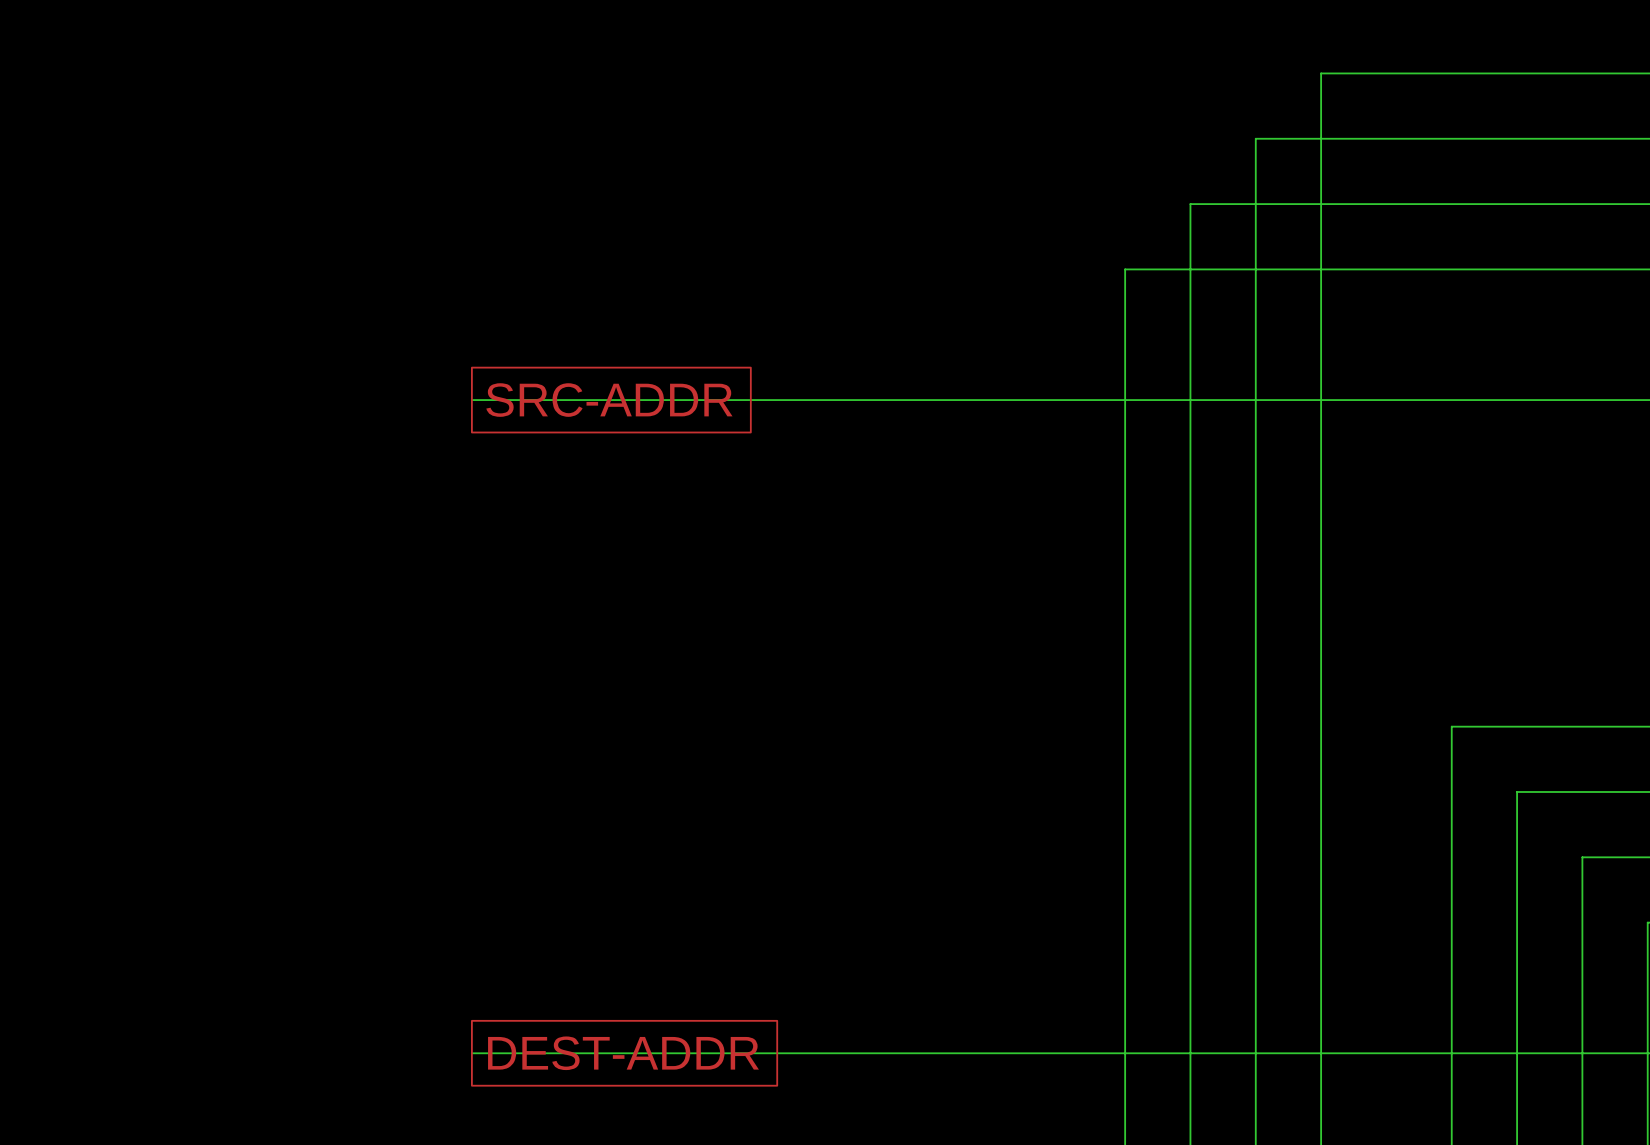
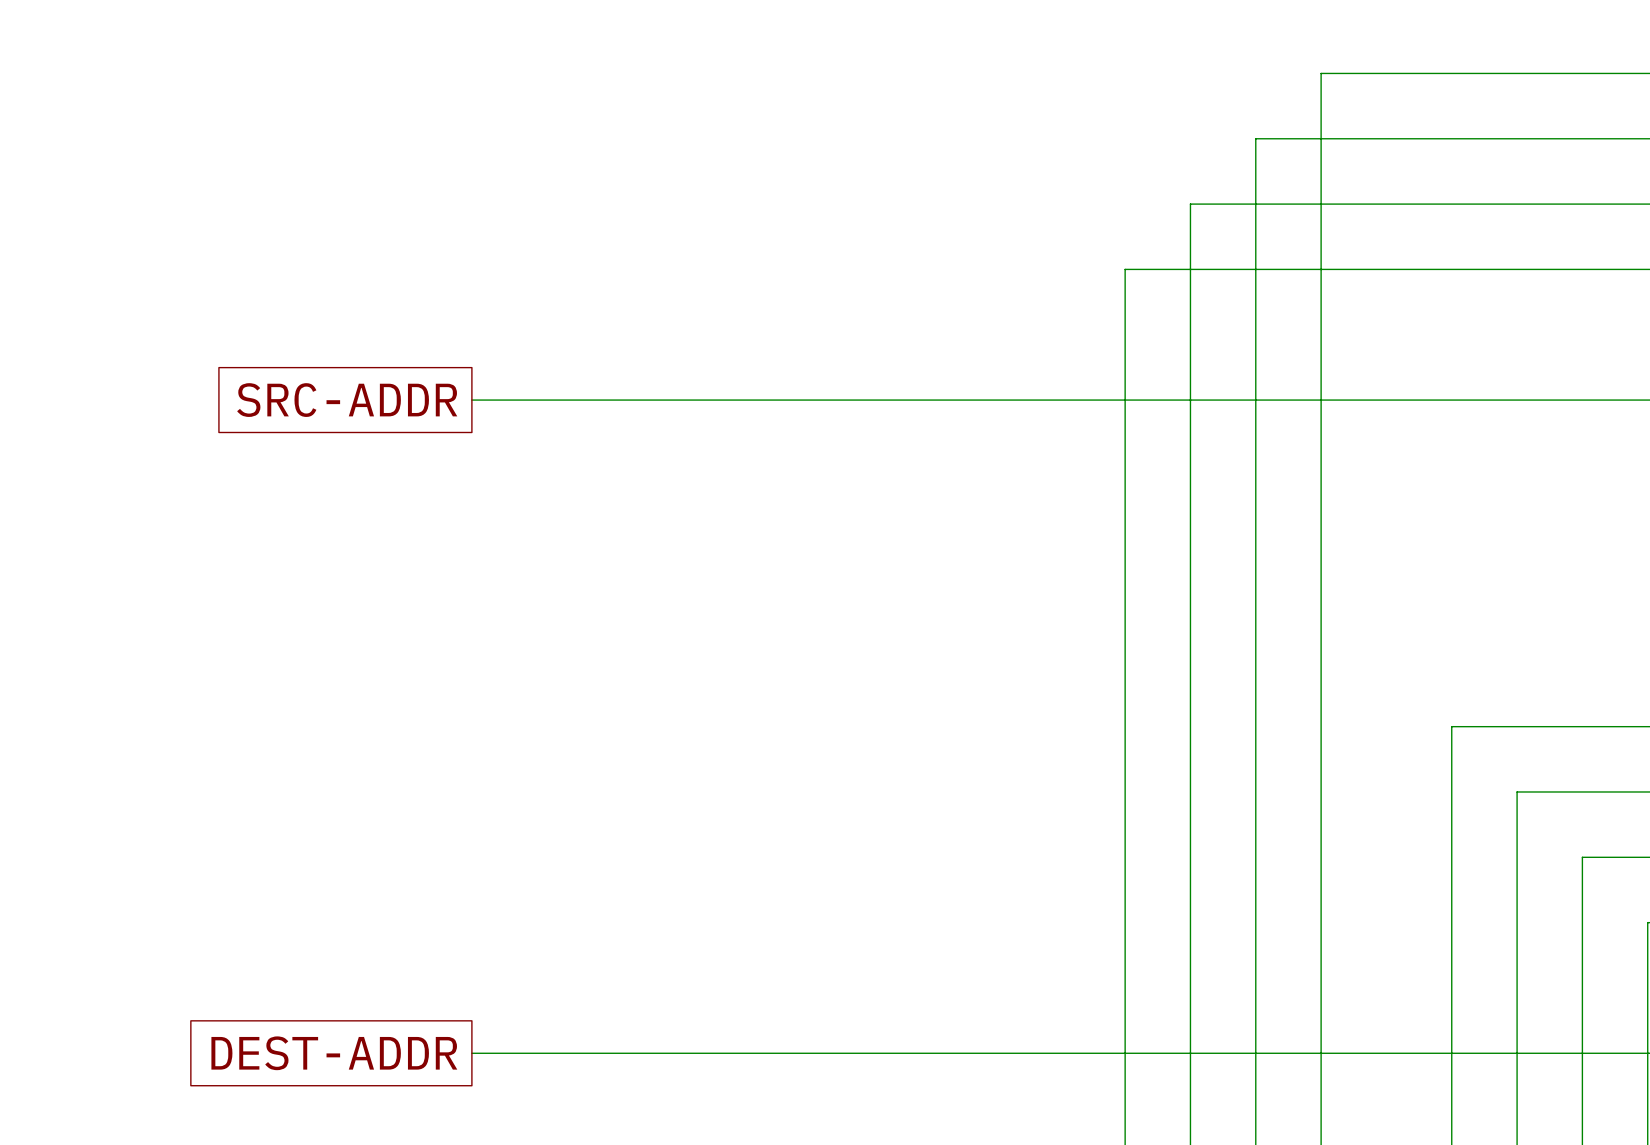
global label rotation: 0° (609, 400) -> 180° (347, 400)
global label rotation: 0° (623, 1053) -> 180° (334, 1053)

